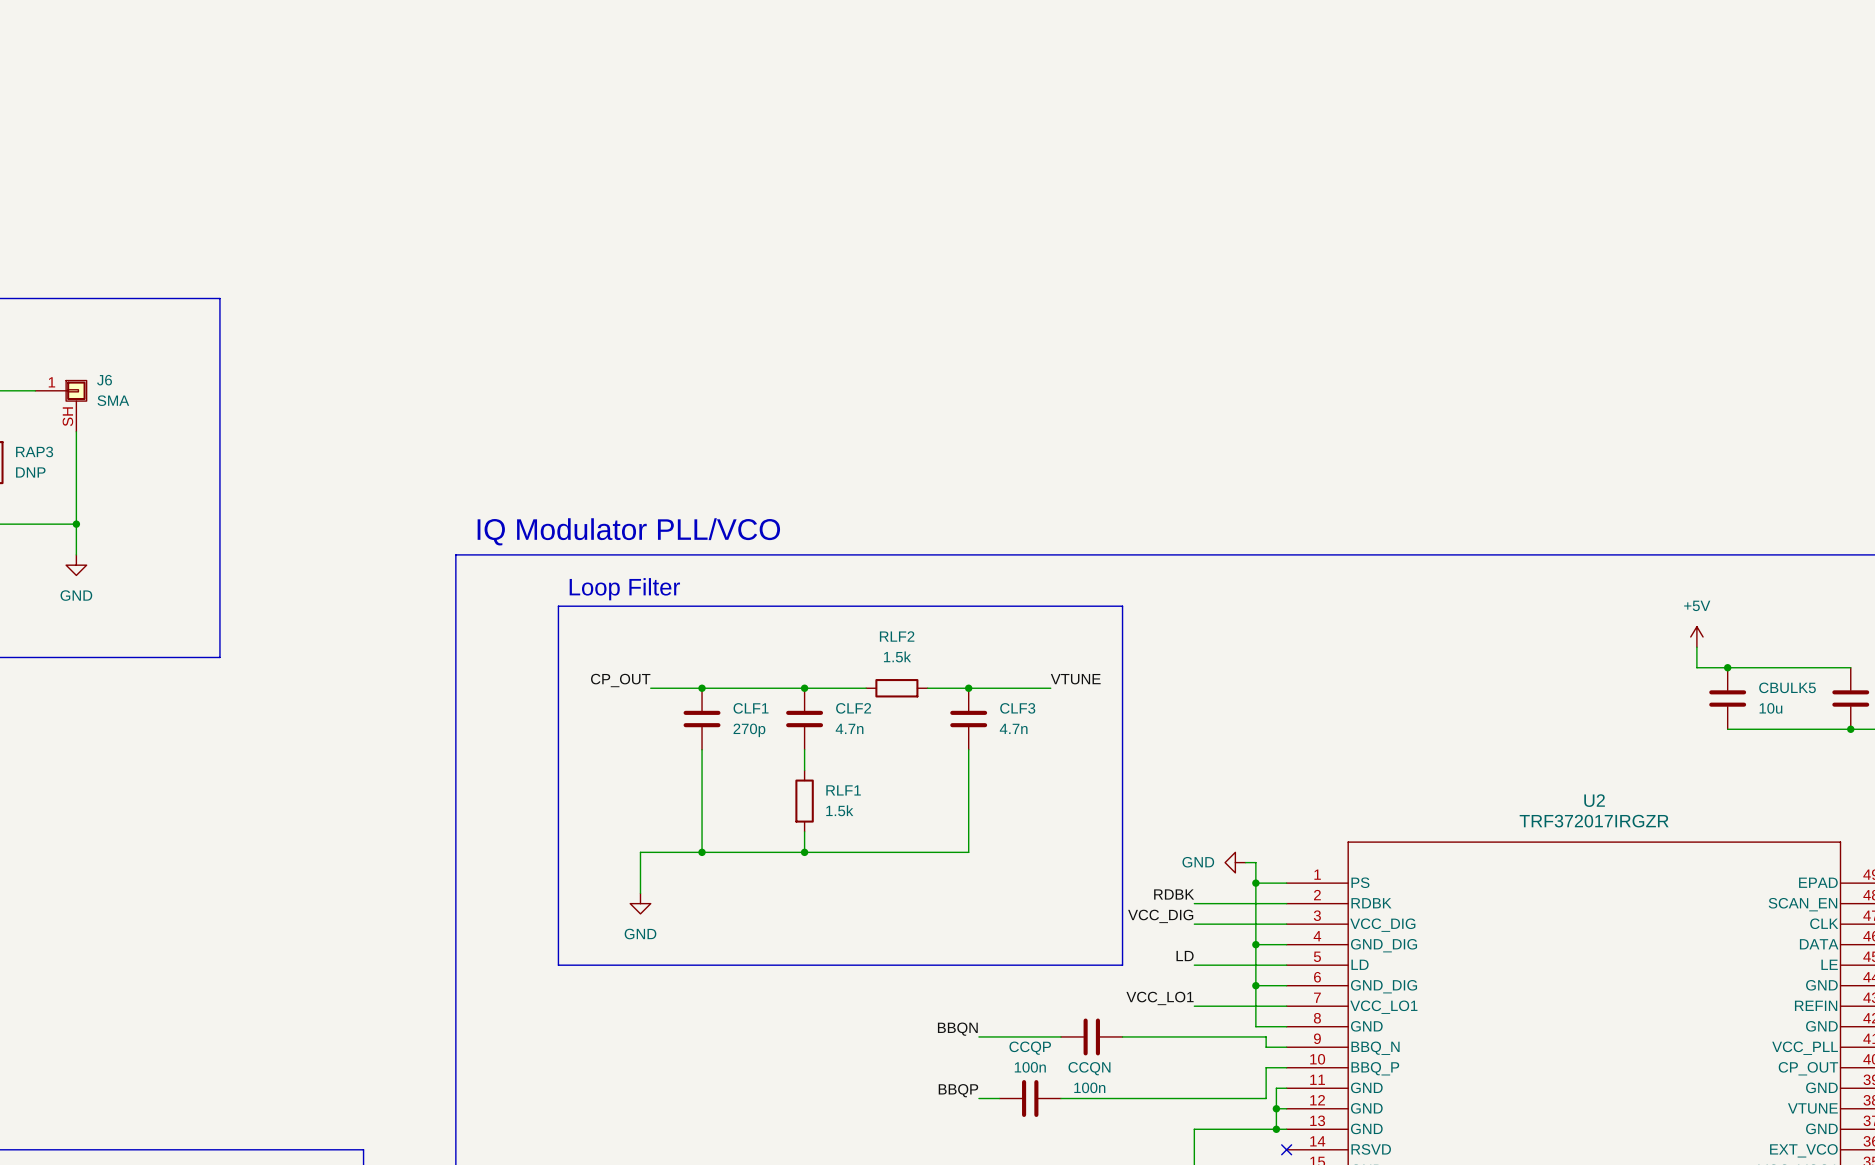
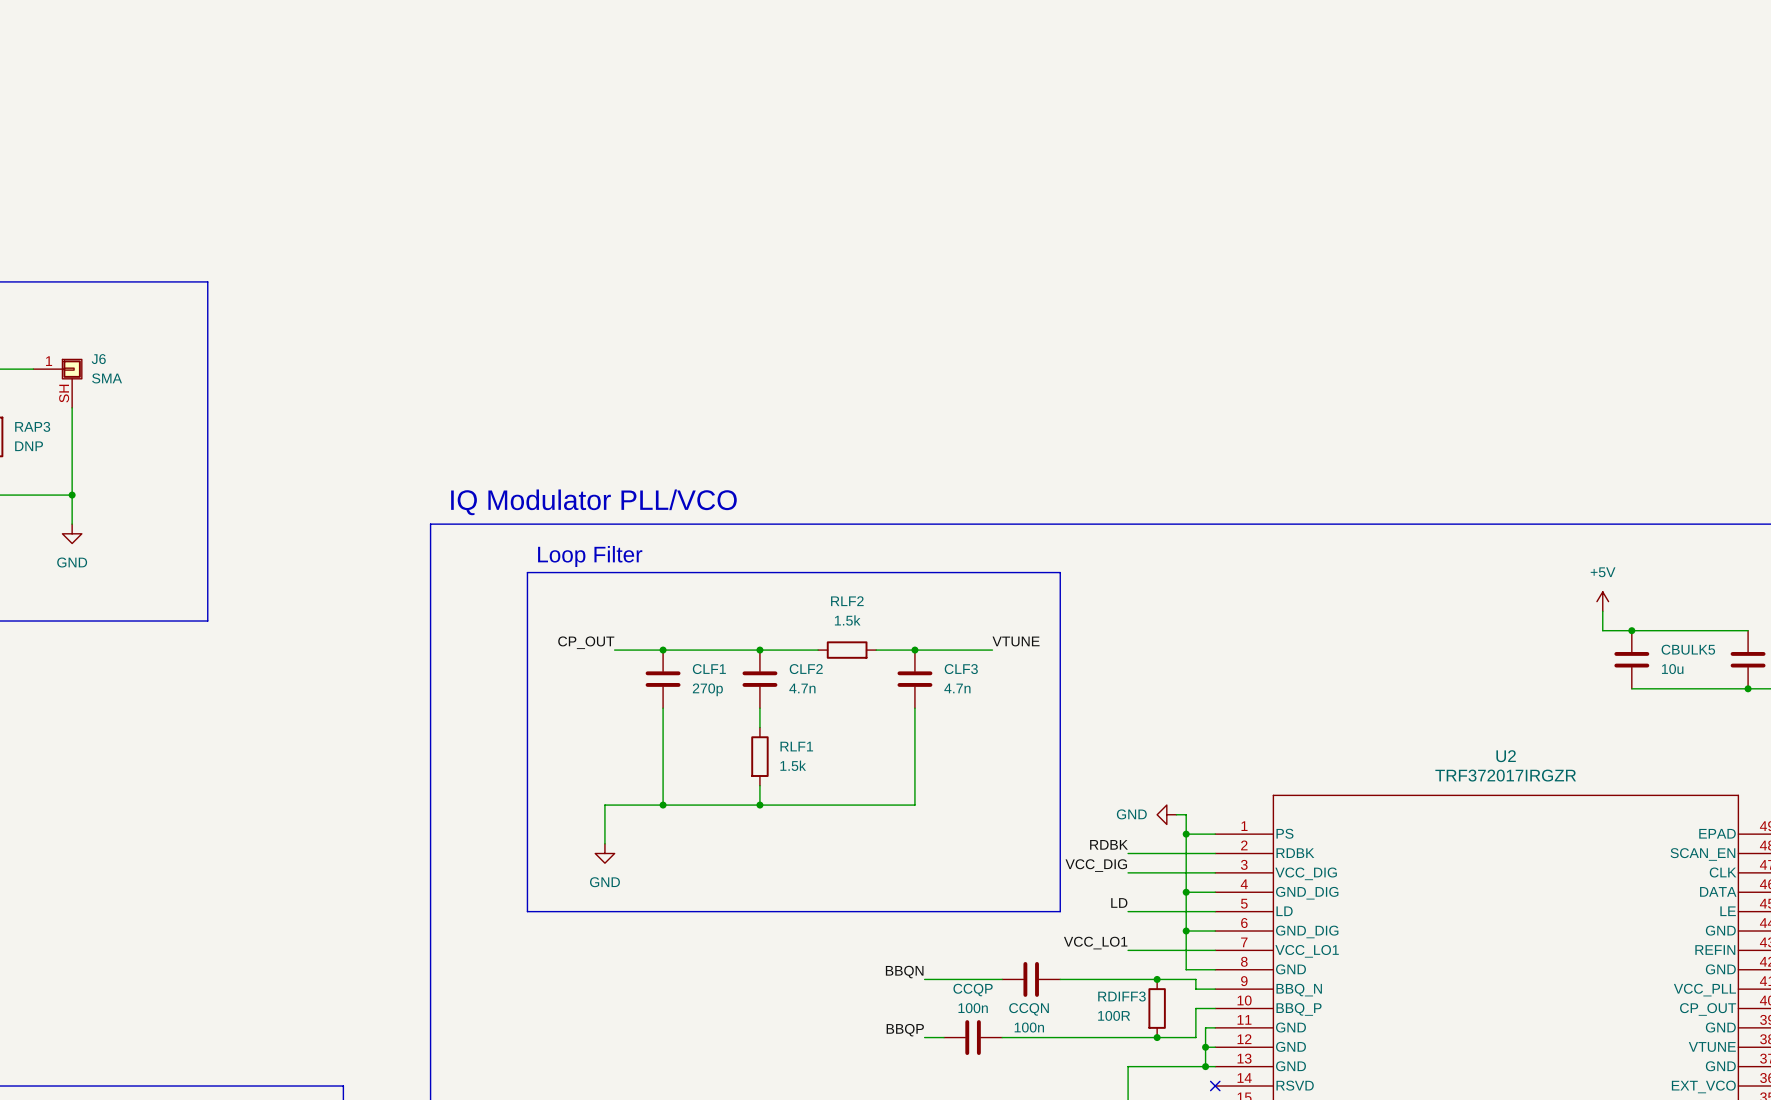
junction: none -> (1157, 979)
RDIFF3: none -> 100R (1157, 1008)
junction: none -> (1157, 1037)

